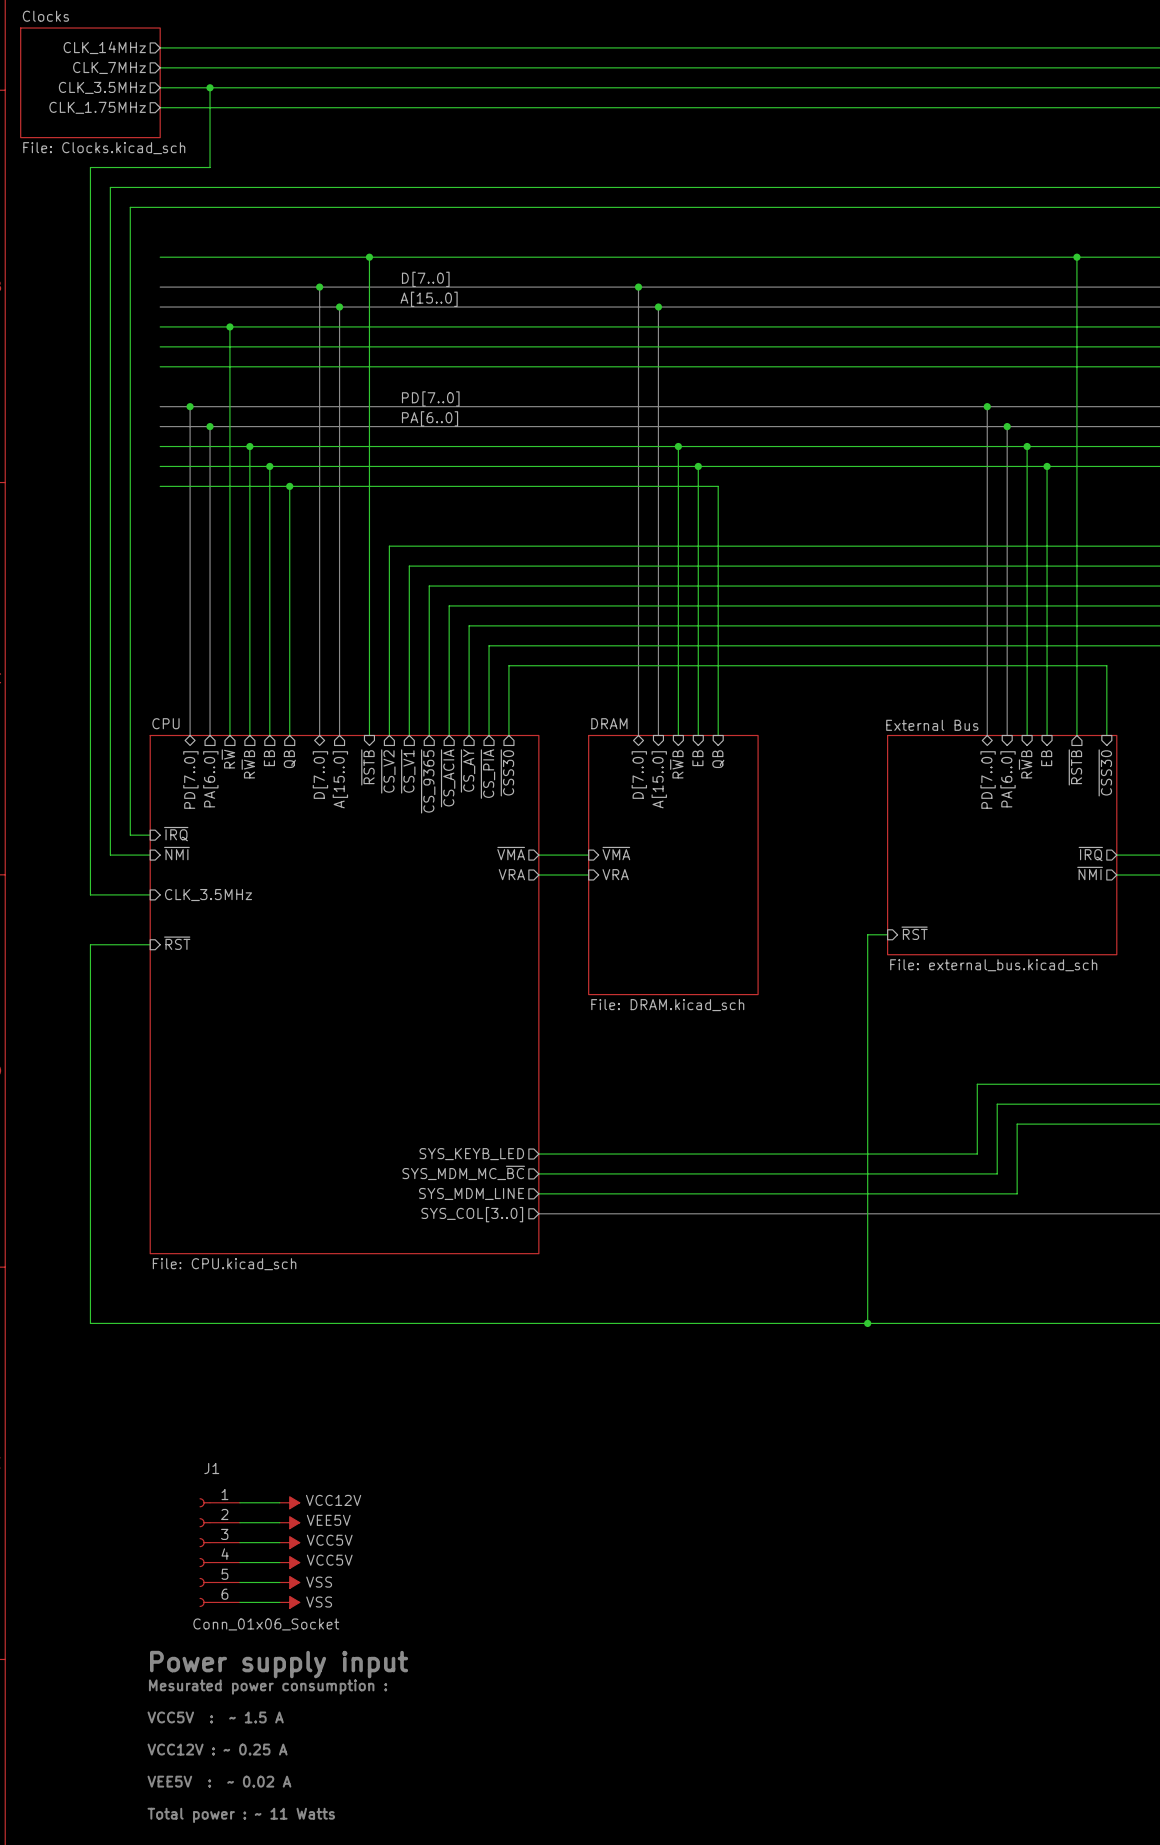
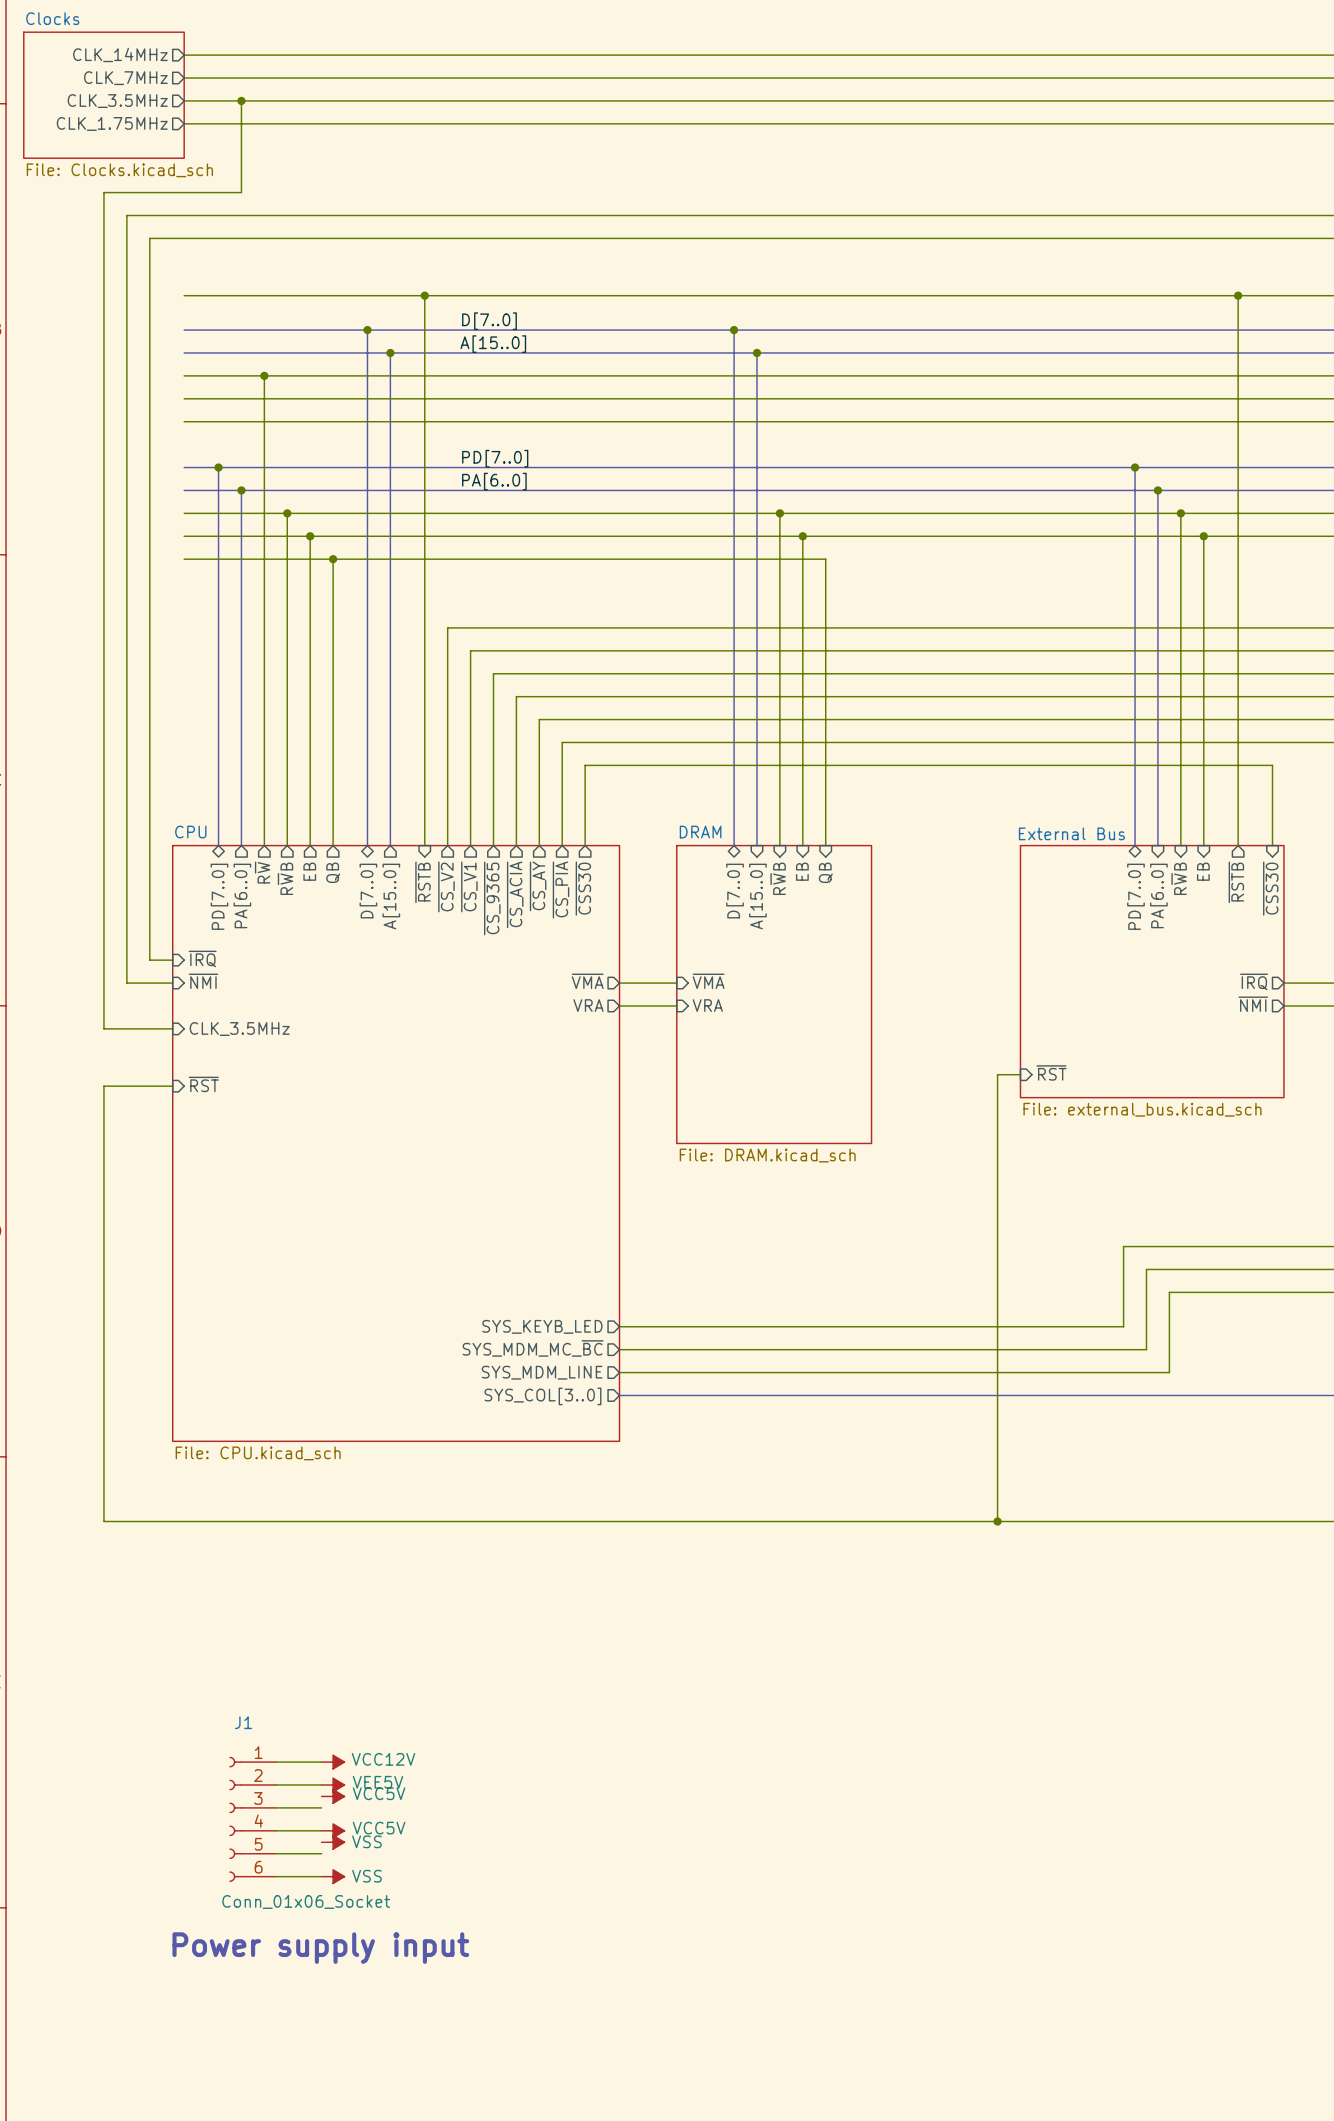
wire: (239, 1502) (279, 1502) -> (275, 1762) (321, 1762)
power symbol position: VCC12V (289, 1502) -> VCC12V (333, 1762)
wire: (239, 1522) (279, 1522) -> (275, 1785) (321, 1785)
power symbol position: VEE5V (289, 1522) -> VEE5V (333, 1785)
wire: (239, 1542) (279, 1542) -> (275, 1807) (321, 1807)
power symbol position: VCC5V (289, 1542) -> VCC5V (333, 1830)
J1 position: (219, 1552) -> (252, 1819)
wire: (239, 1562) (279, 1562) -> (275, 1830) (321, 1830)
wire: (239, 1582) (279, 1582) -> (275, 1853) (321, 1853)
power symbol position: VSS (289, 1582) -> VSS (333, 1876)
wire: (239, 1602) (279, 1602) -> (275, 1876) (321, 1876)
text position: Power supply input (279, 1664) -> Power supply input (320, 1948)
text: Mesurated power consumption : (268, 1687) -> none
text: VCC5V : ~ 1.5 A (215, 1717) -> none
text: VCC12V : ~ 0.25 A (217, 1749) -> none
text: VEE5V : ~ 0.02 A (219, 1781) -> none
text: Total power : ~ 11 Watts (241, 1815) -> none

